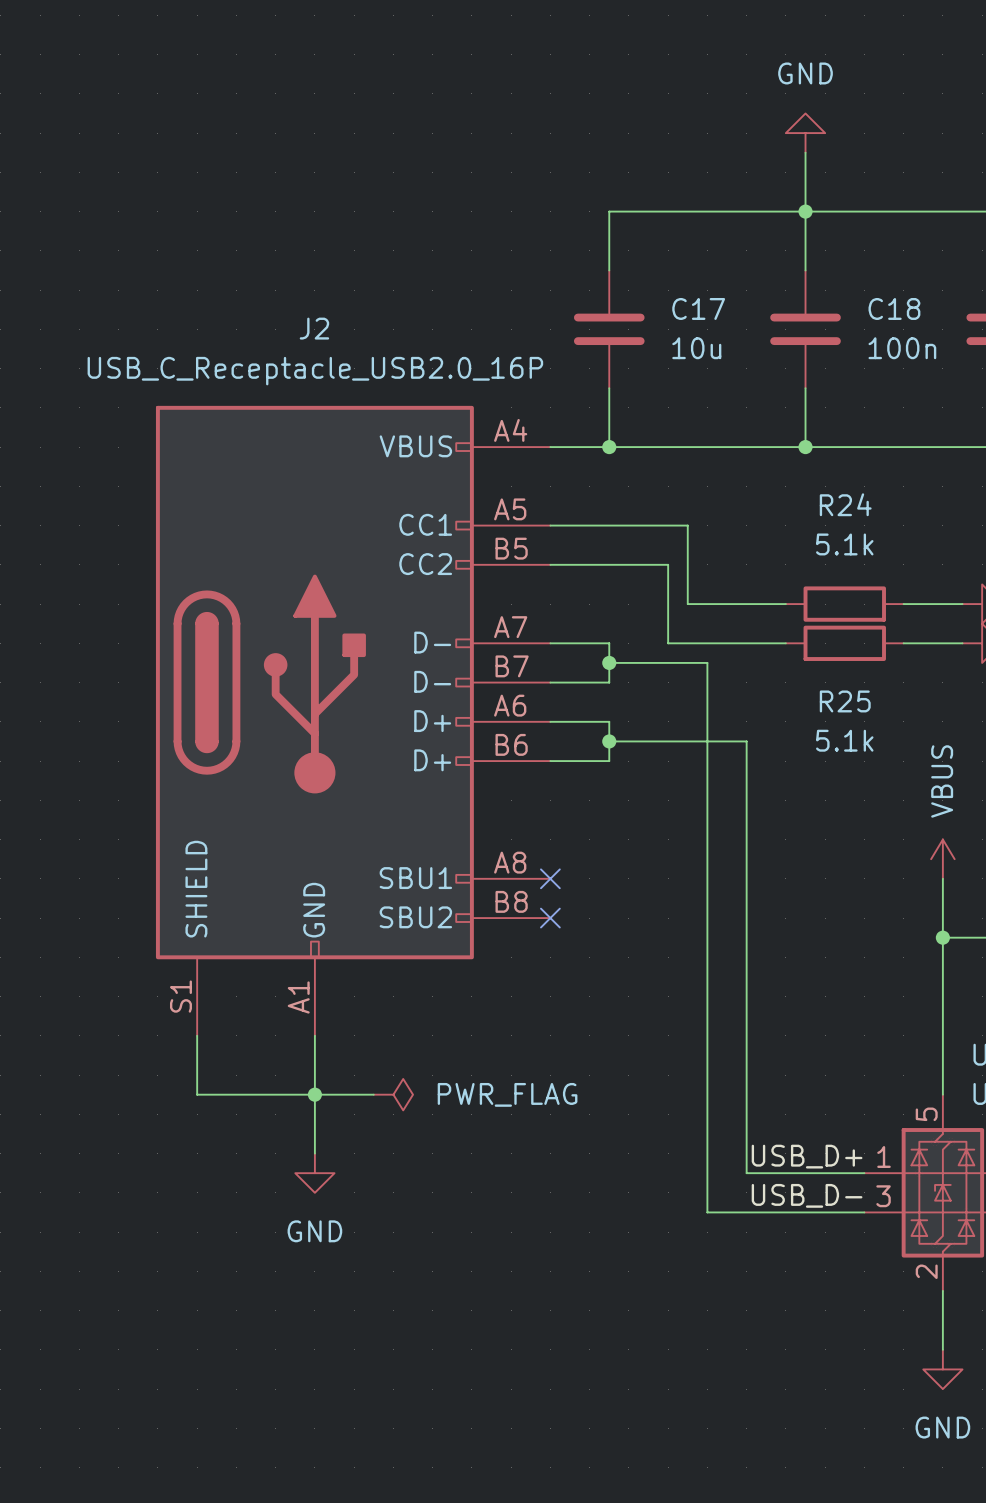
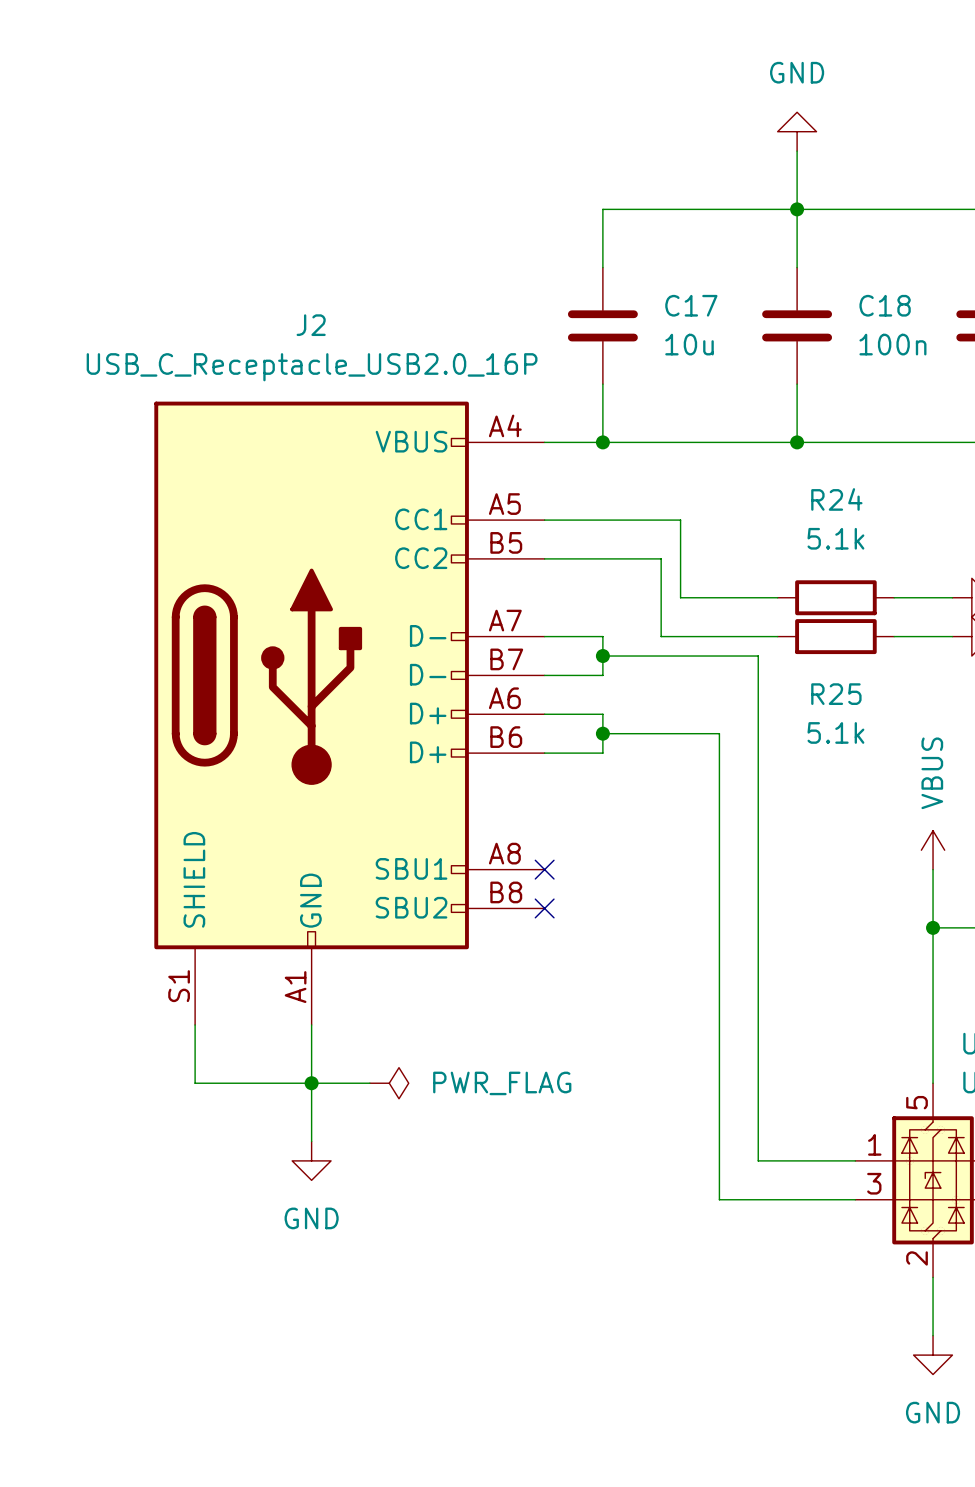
wire: (707, 662) (707, 1212) (727, 1212) -> (699, 656) (758, 656) (758, 1160)
wire: (727, 741) (746, 741) (746, 1173) (766, 1173) -> (719, 733) (719, 1199)
label: USB_D+ (807, 1156) -> none
label: USB_D- (807, 1195) -> none

